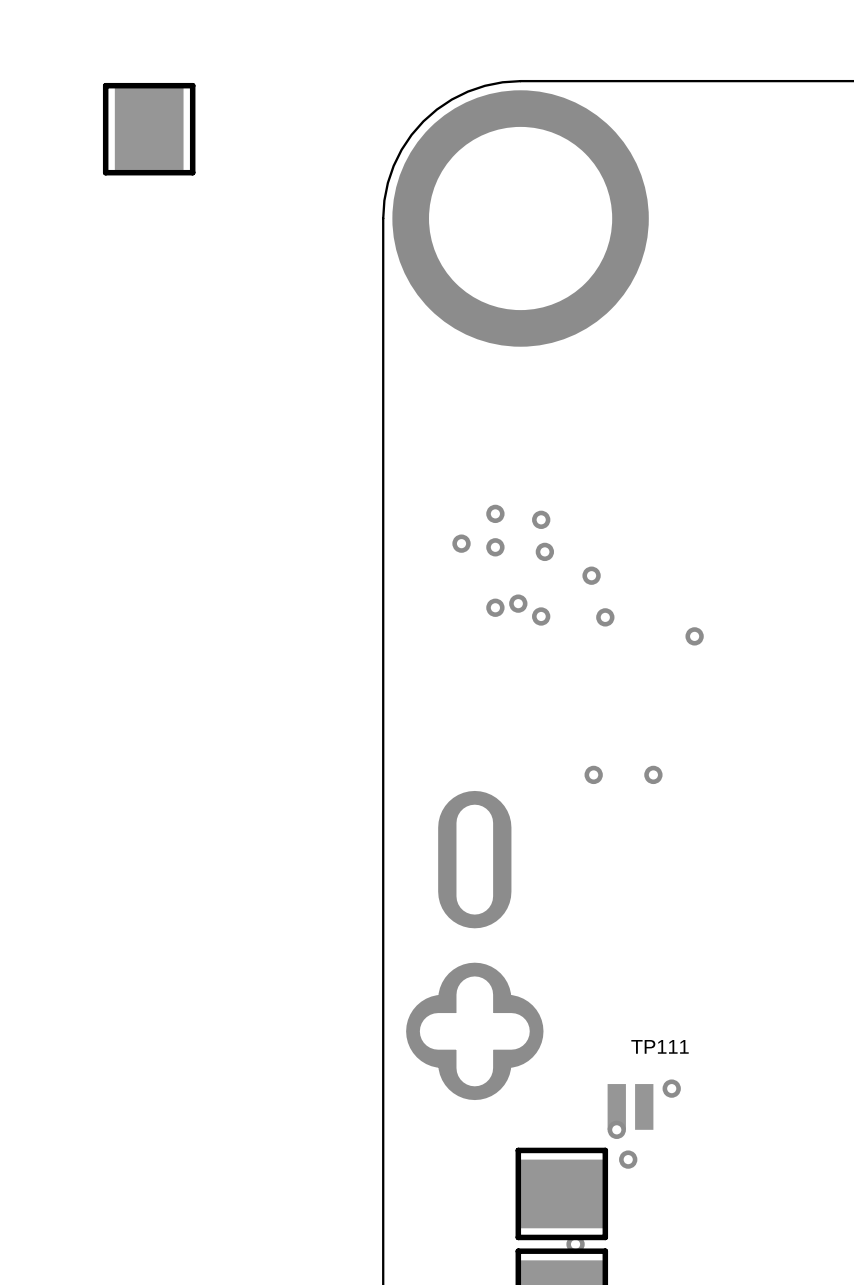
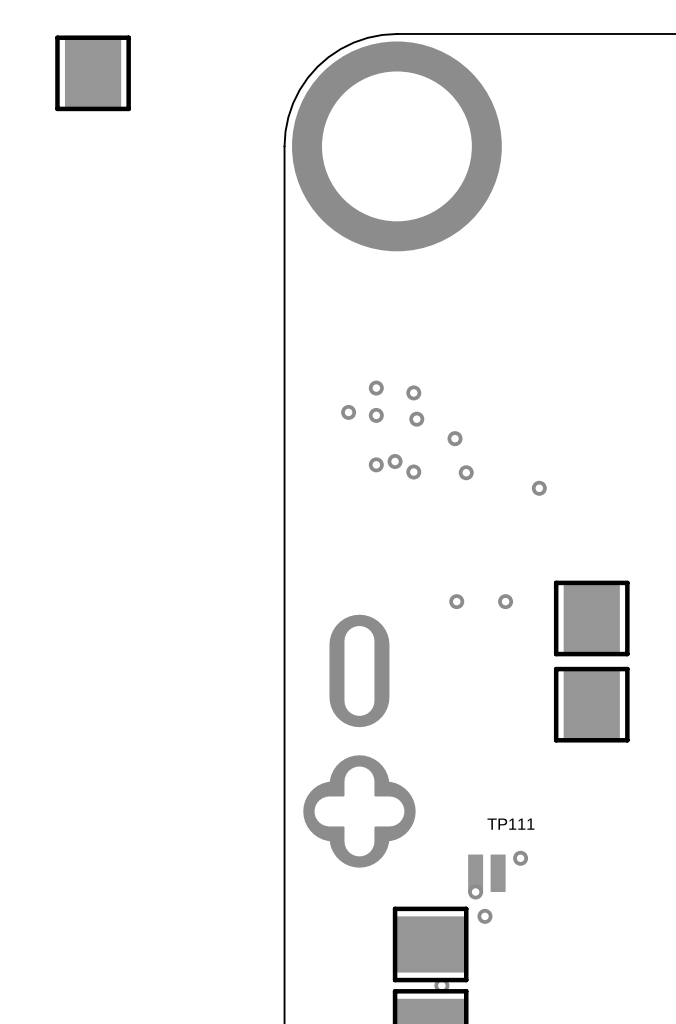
part: none -> (591, 618)
part: none -> (591, 704)

